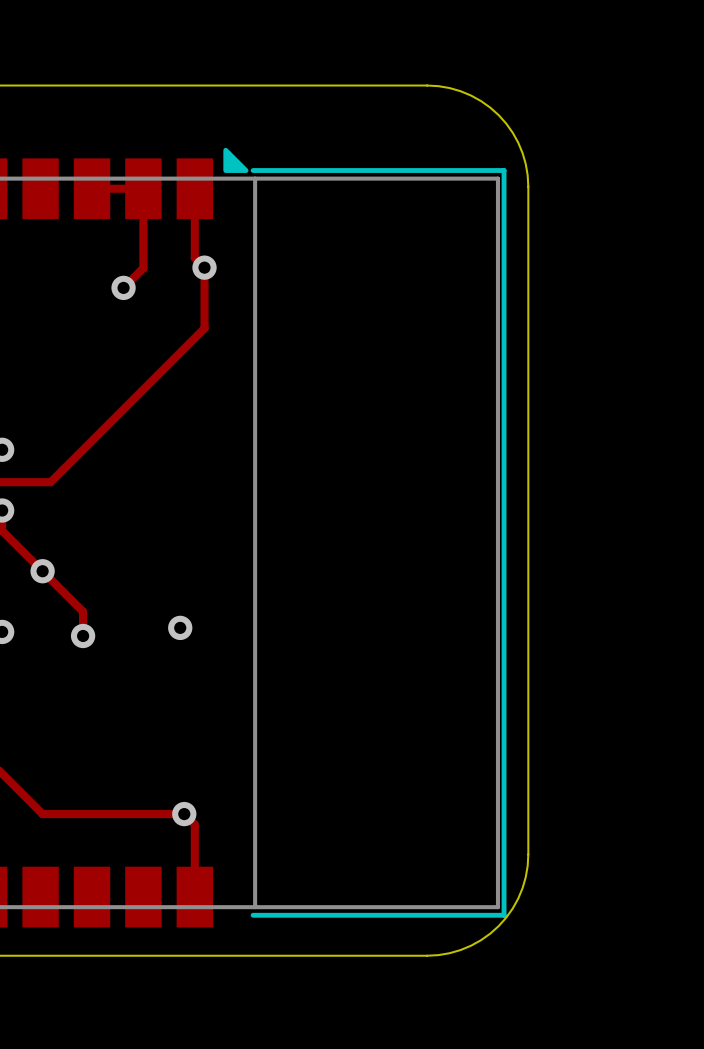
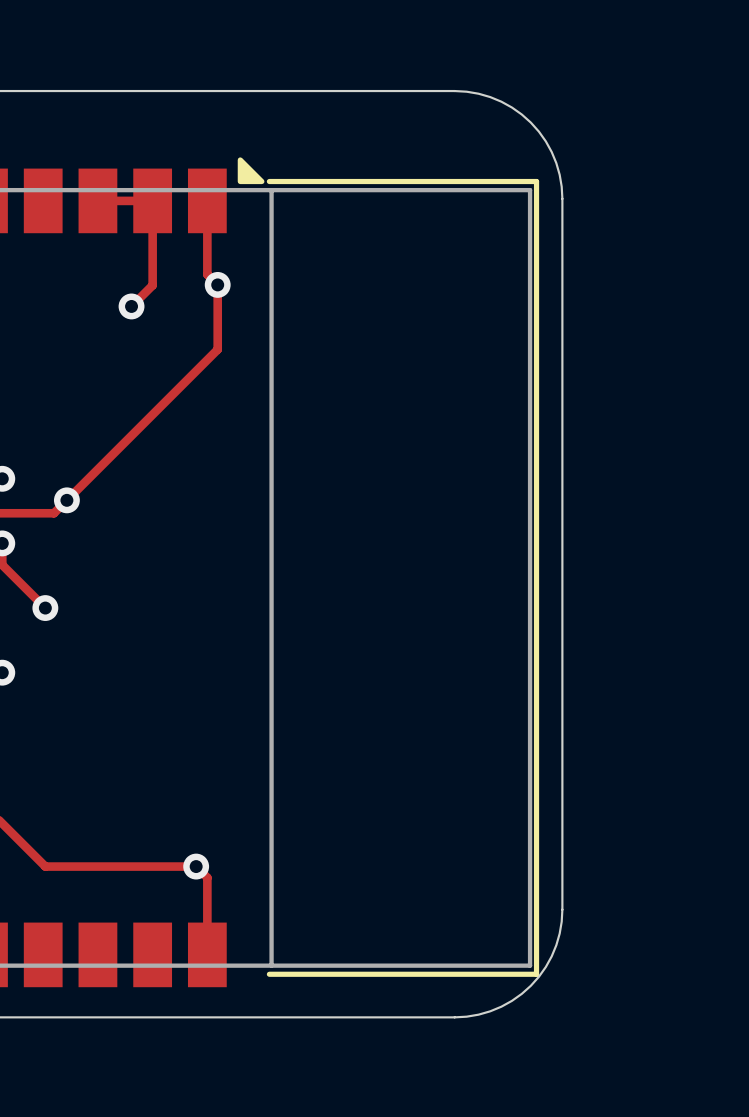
via: none -> (66, 500)
track: (42, 571) (83, 611) (83, 635) -> none
via: (180, 627) -> none
via: (83, 635) -> none

